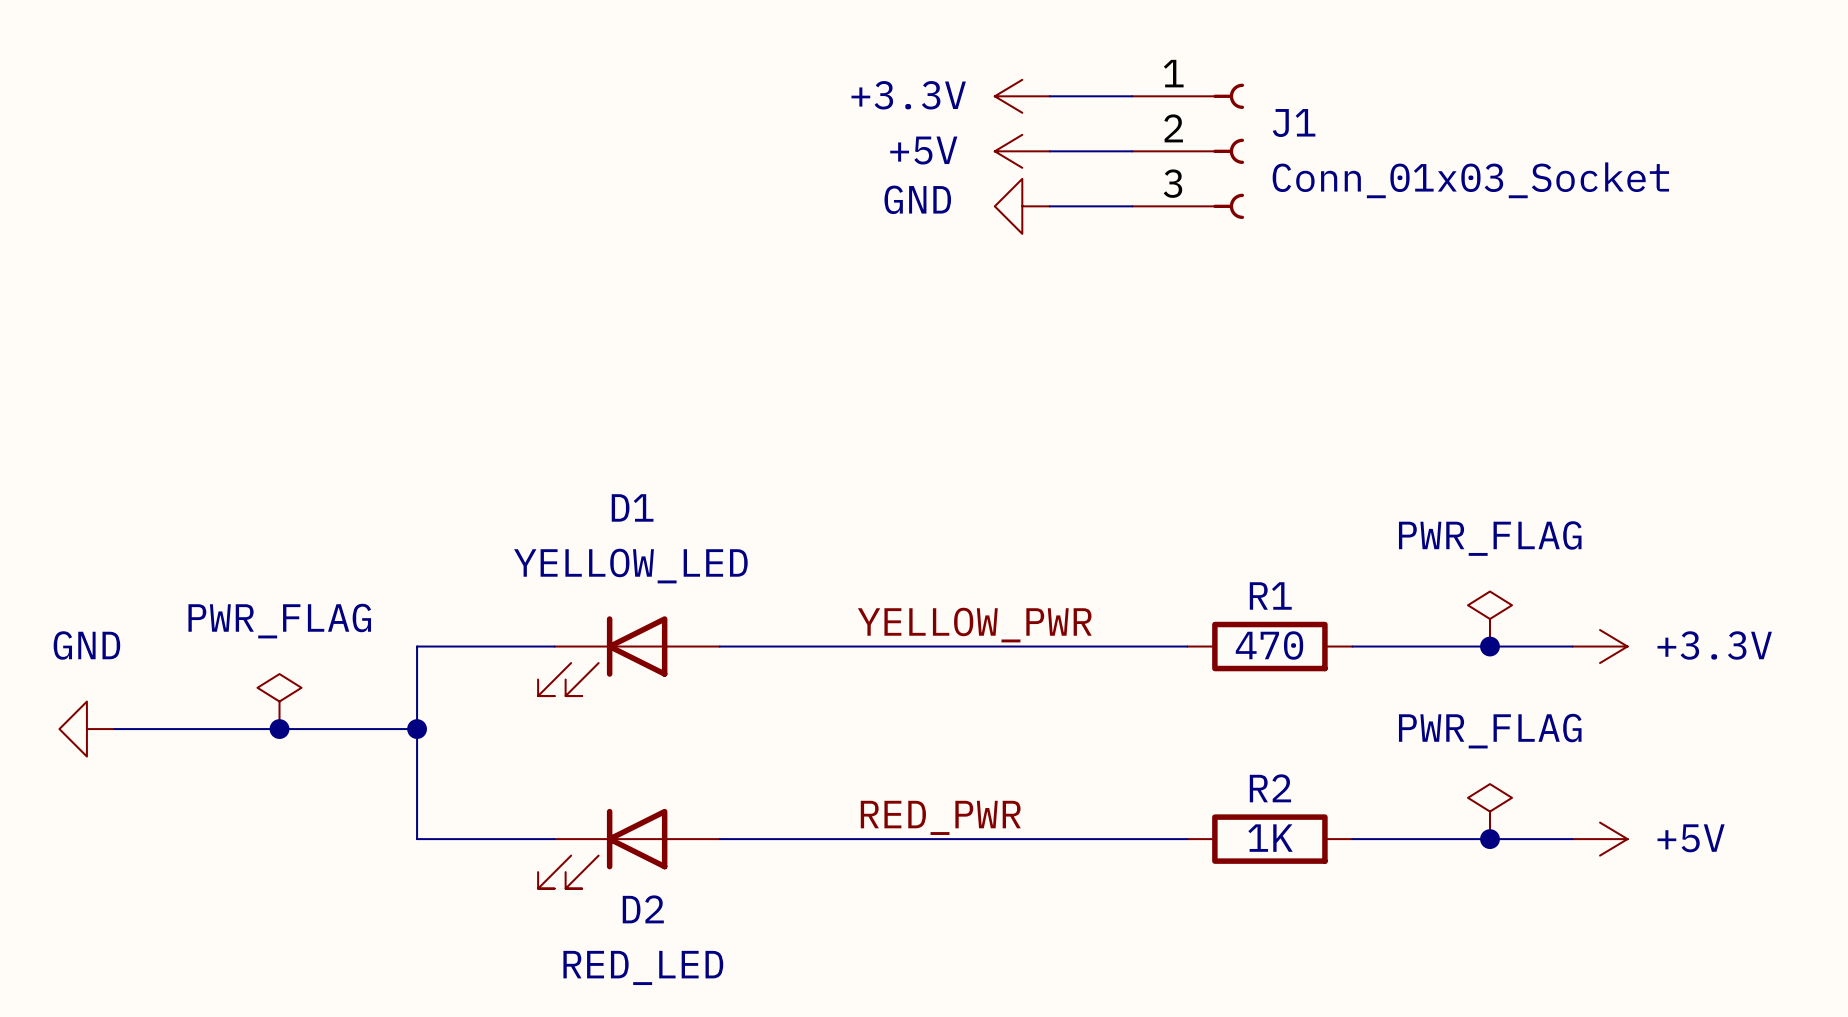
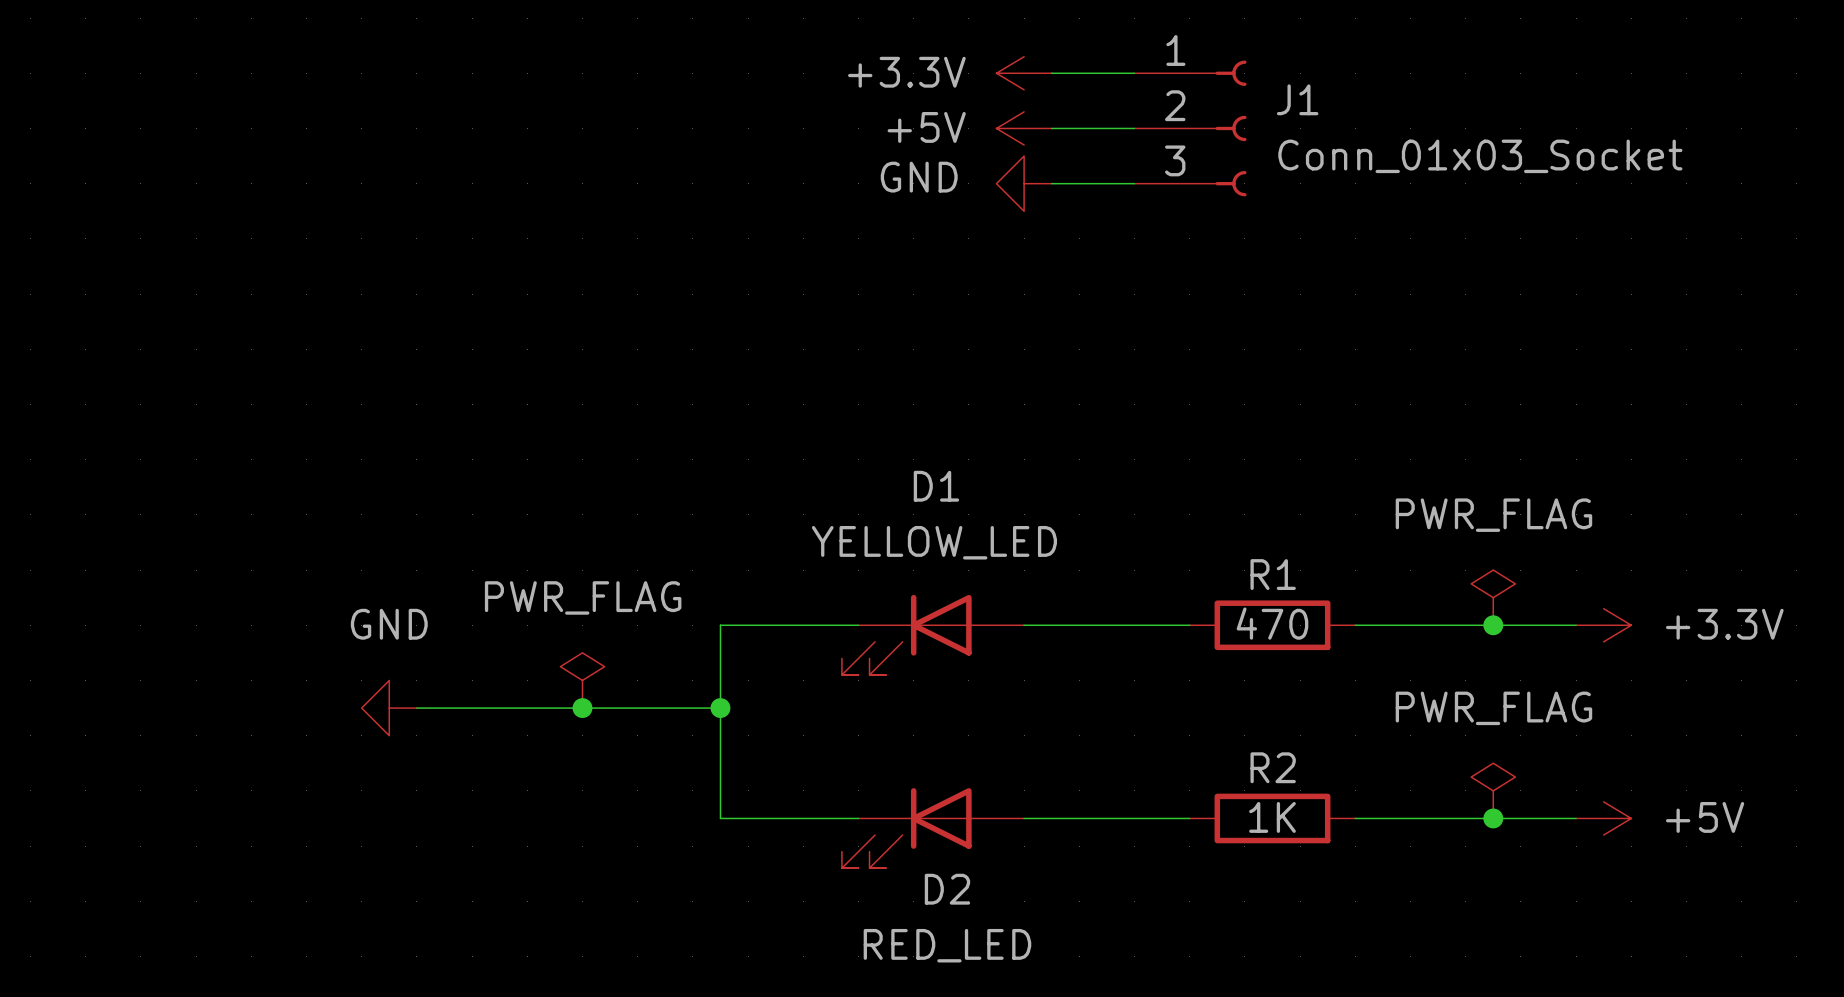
label: YELLOW_PWR (974, 625) -> none
wire: (554, 646) (417, 646) (417, 839) (554, 839) -> none
wire: none -> (720, 625) (720, 818)
D1 position: (628, 656) -> (933, 634)
power symbol position: PWR_FLAG (279, 701) -> PWR_FLAG (582, 680)
power symbol position: GND (86, 729) -> GND (389, 708)
wire: (114, 729) (417, 729) -> (720, 708) (416, 708)
junction: (279, 729) -> none
junction: (417, 729) -> none
junction: none -> (582, 708)
junction: none -> (720, 708)
label: RED_PWR (940, 817) -> none
D2 position: (628, 848) -> (933, 828)

